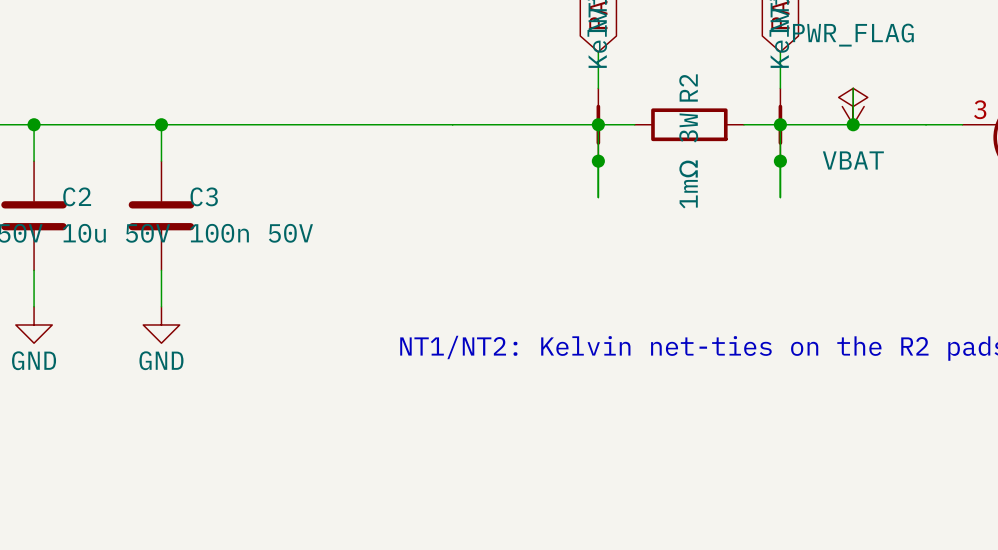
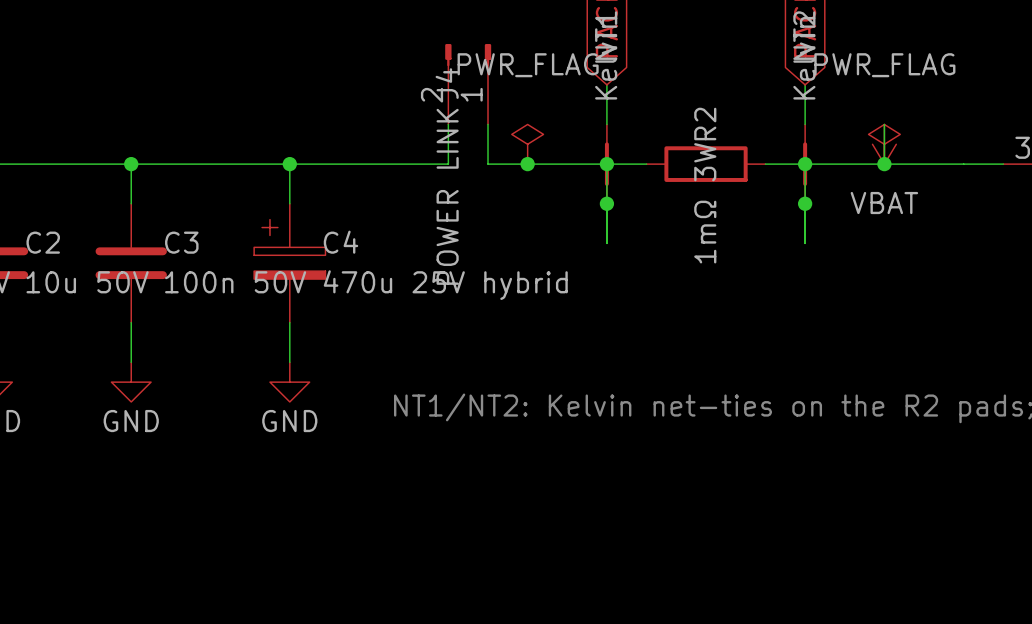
J4: none -> POWER LINK (468, 84)
wire: none -> (488, 124) (488, 164)
power symbol: none -> PWR_FLAG (527, 144)
wire: none -> (289, 164) (289, 203)
junction: none -> (289, 164)
wire: (452, 124) (489, 124) -> (448, 164) (448, 124)
junction: none -> (527, 164)
C4: none -> 470u 25V hybrid (289, 263)
wire: none -> (289, 322) (289, 362)
power symbol: none -> GND (289, 382)

